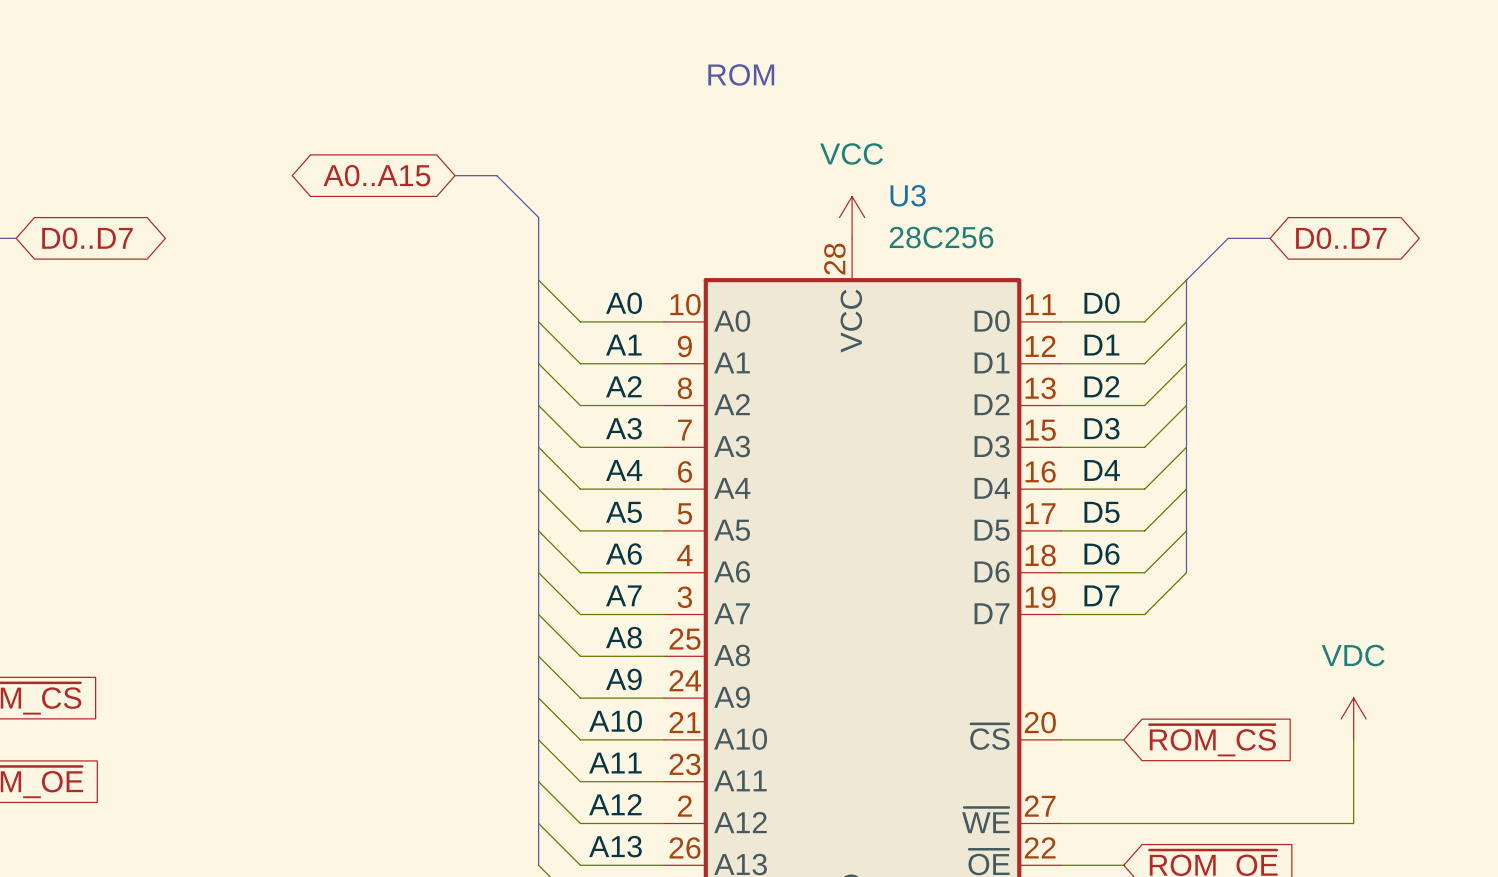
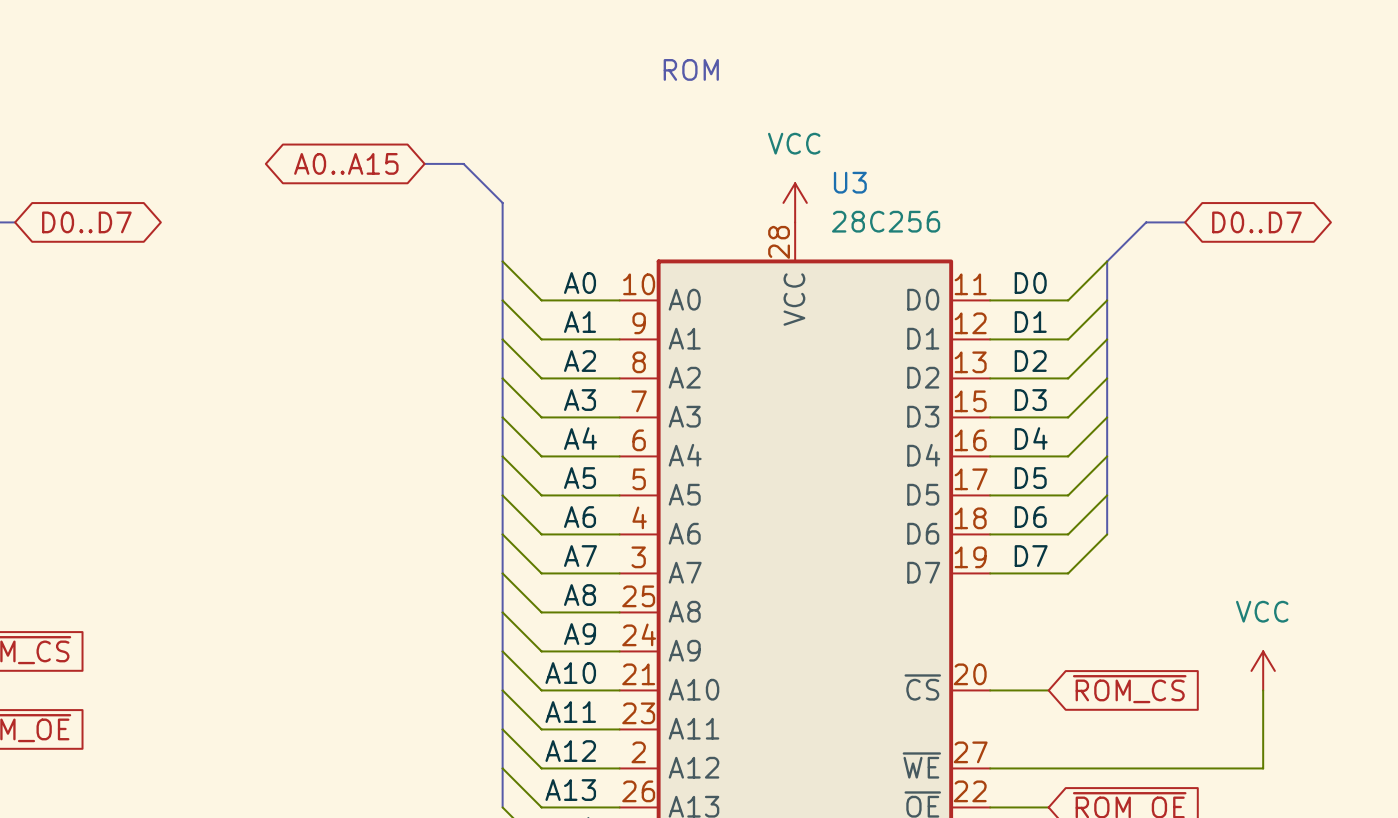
power symbol: VDC (1353, 719) -> VCC (1263, 670)

